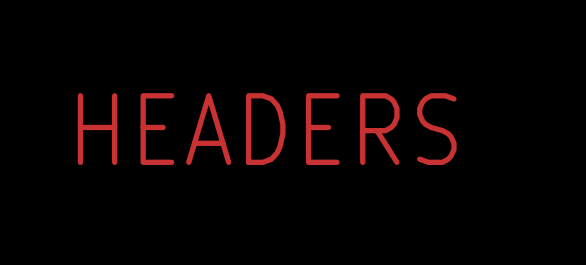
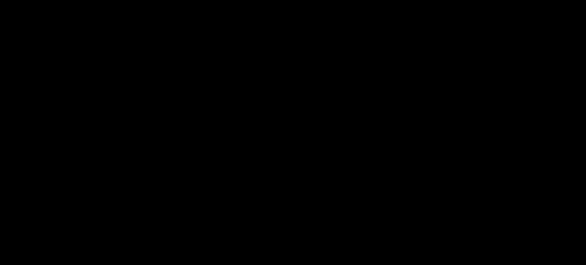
text: HEADERS (267, 129) -> none

